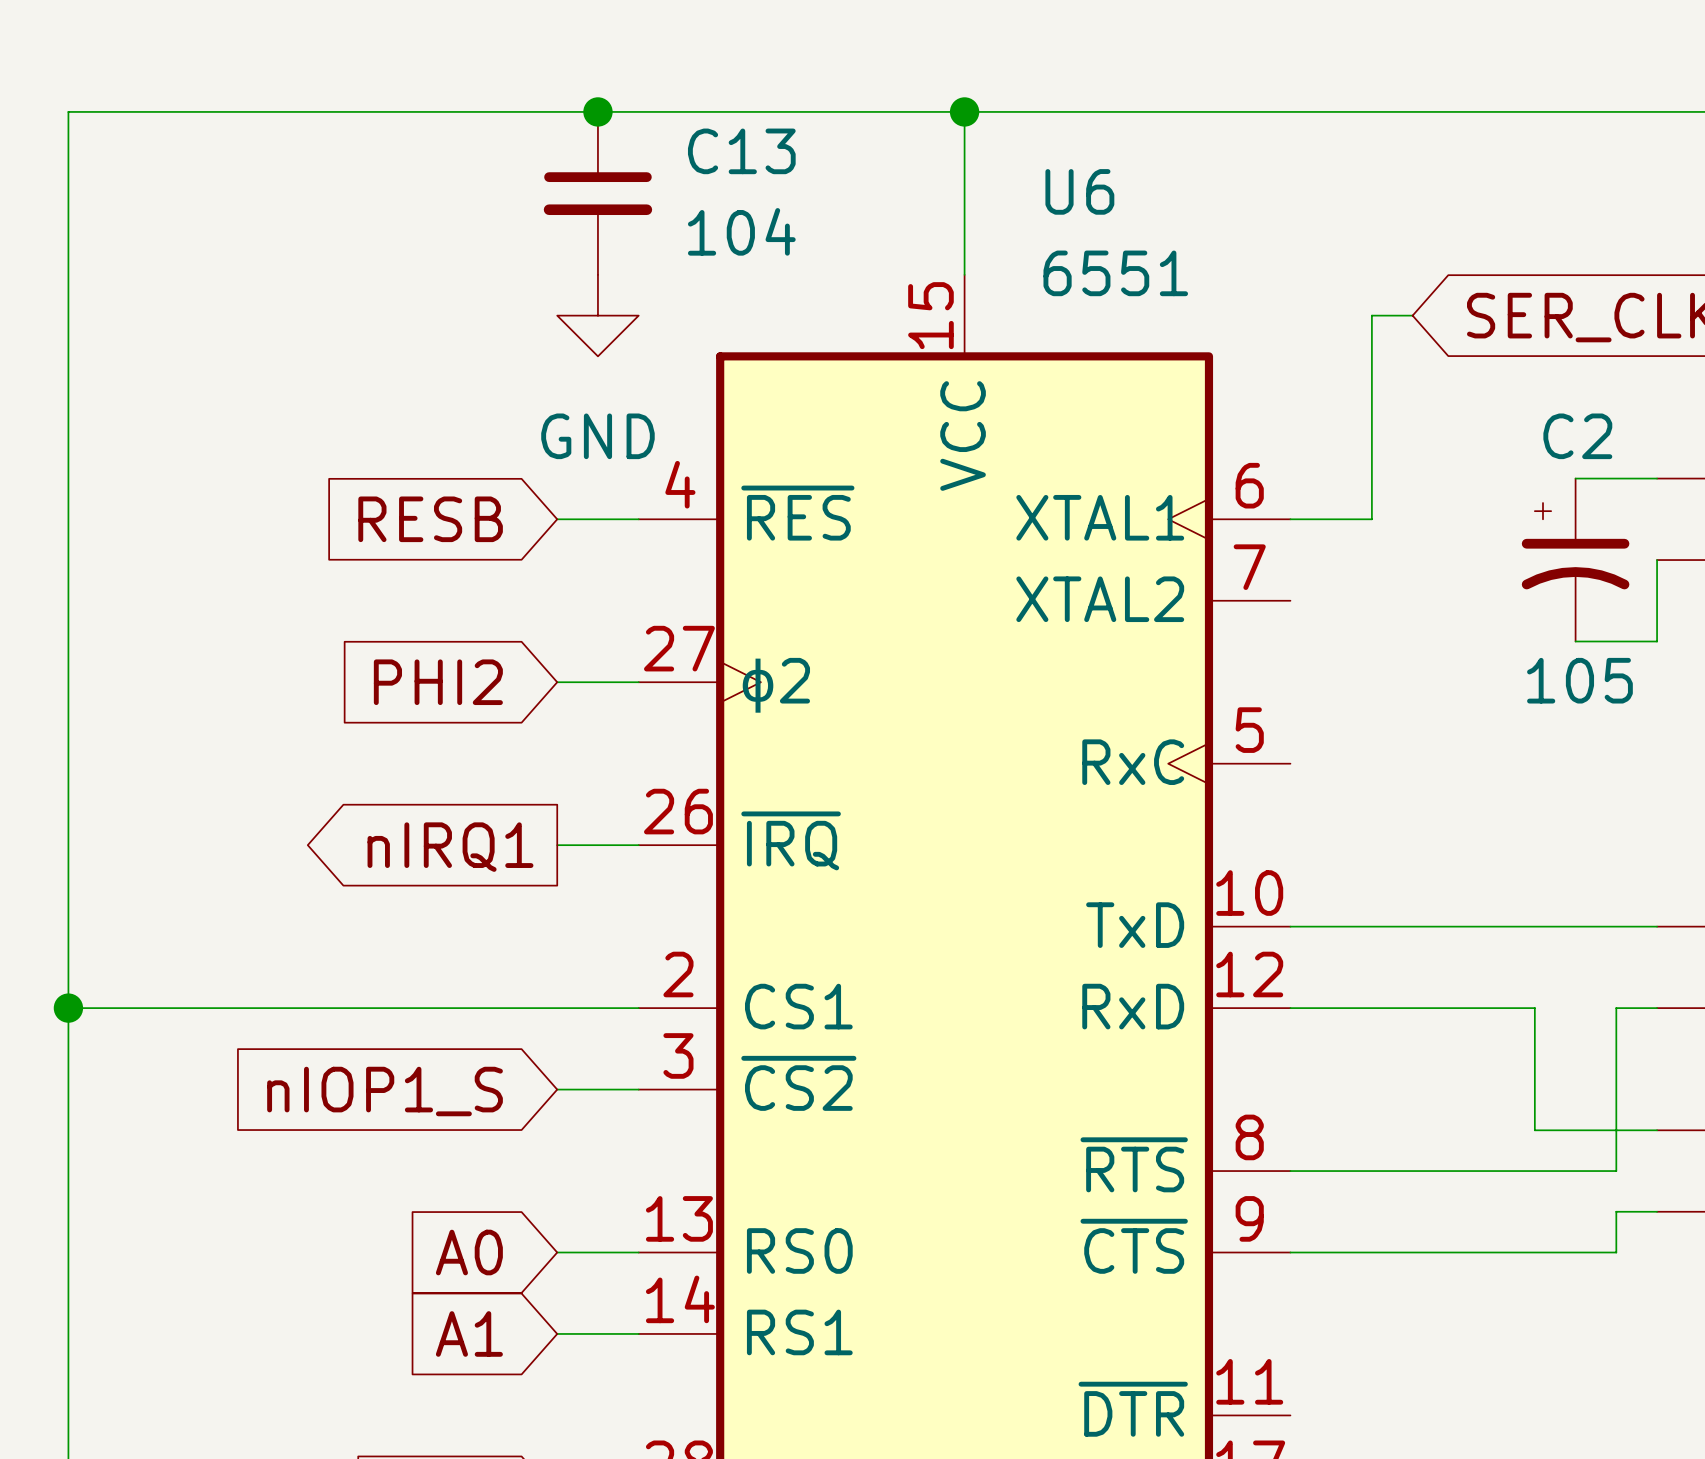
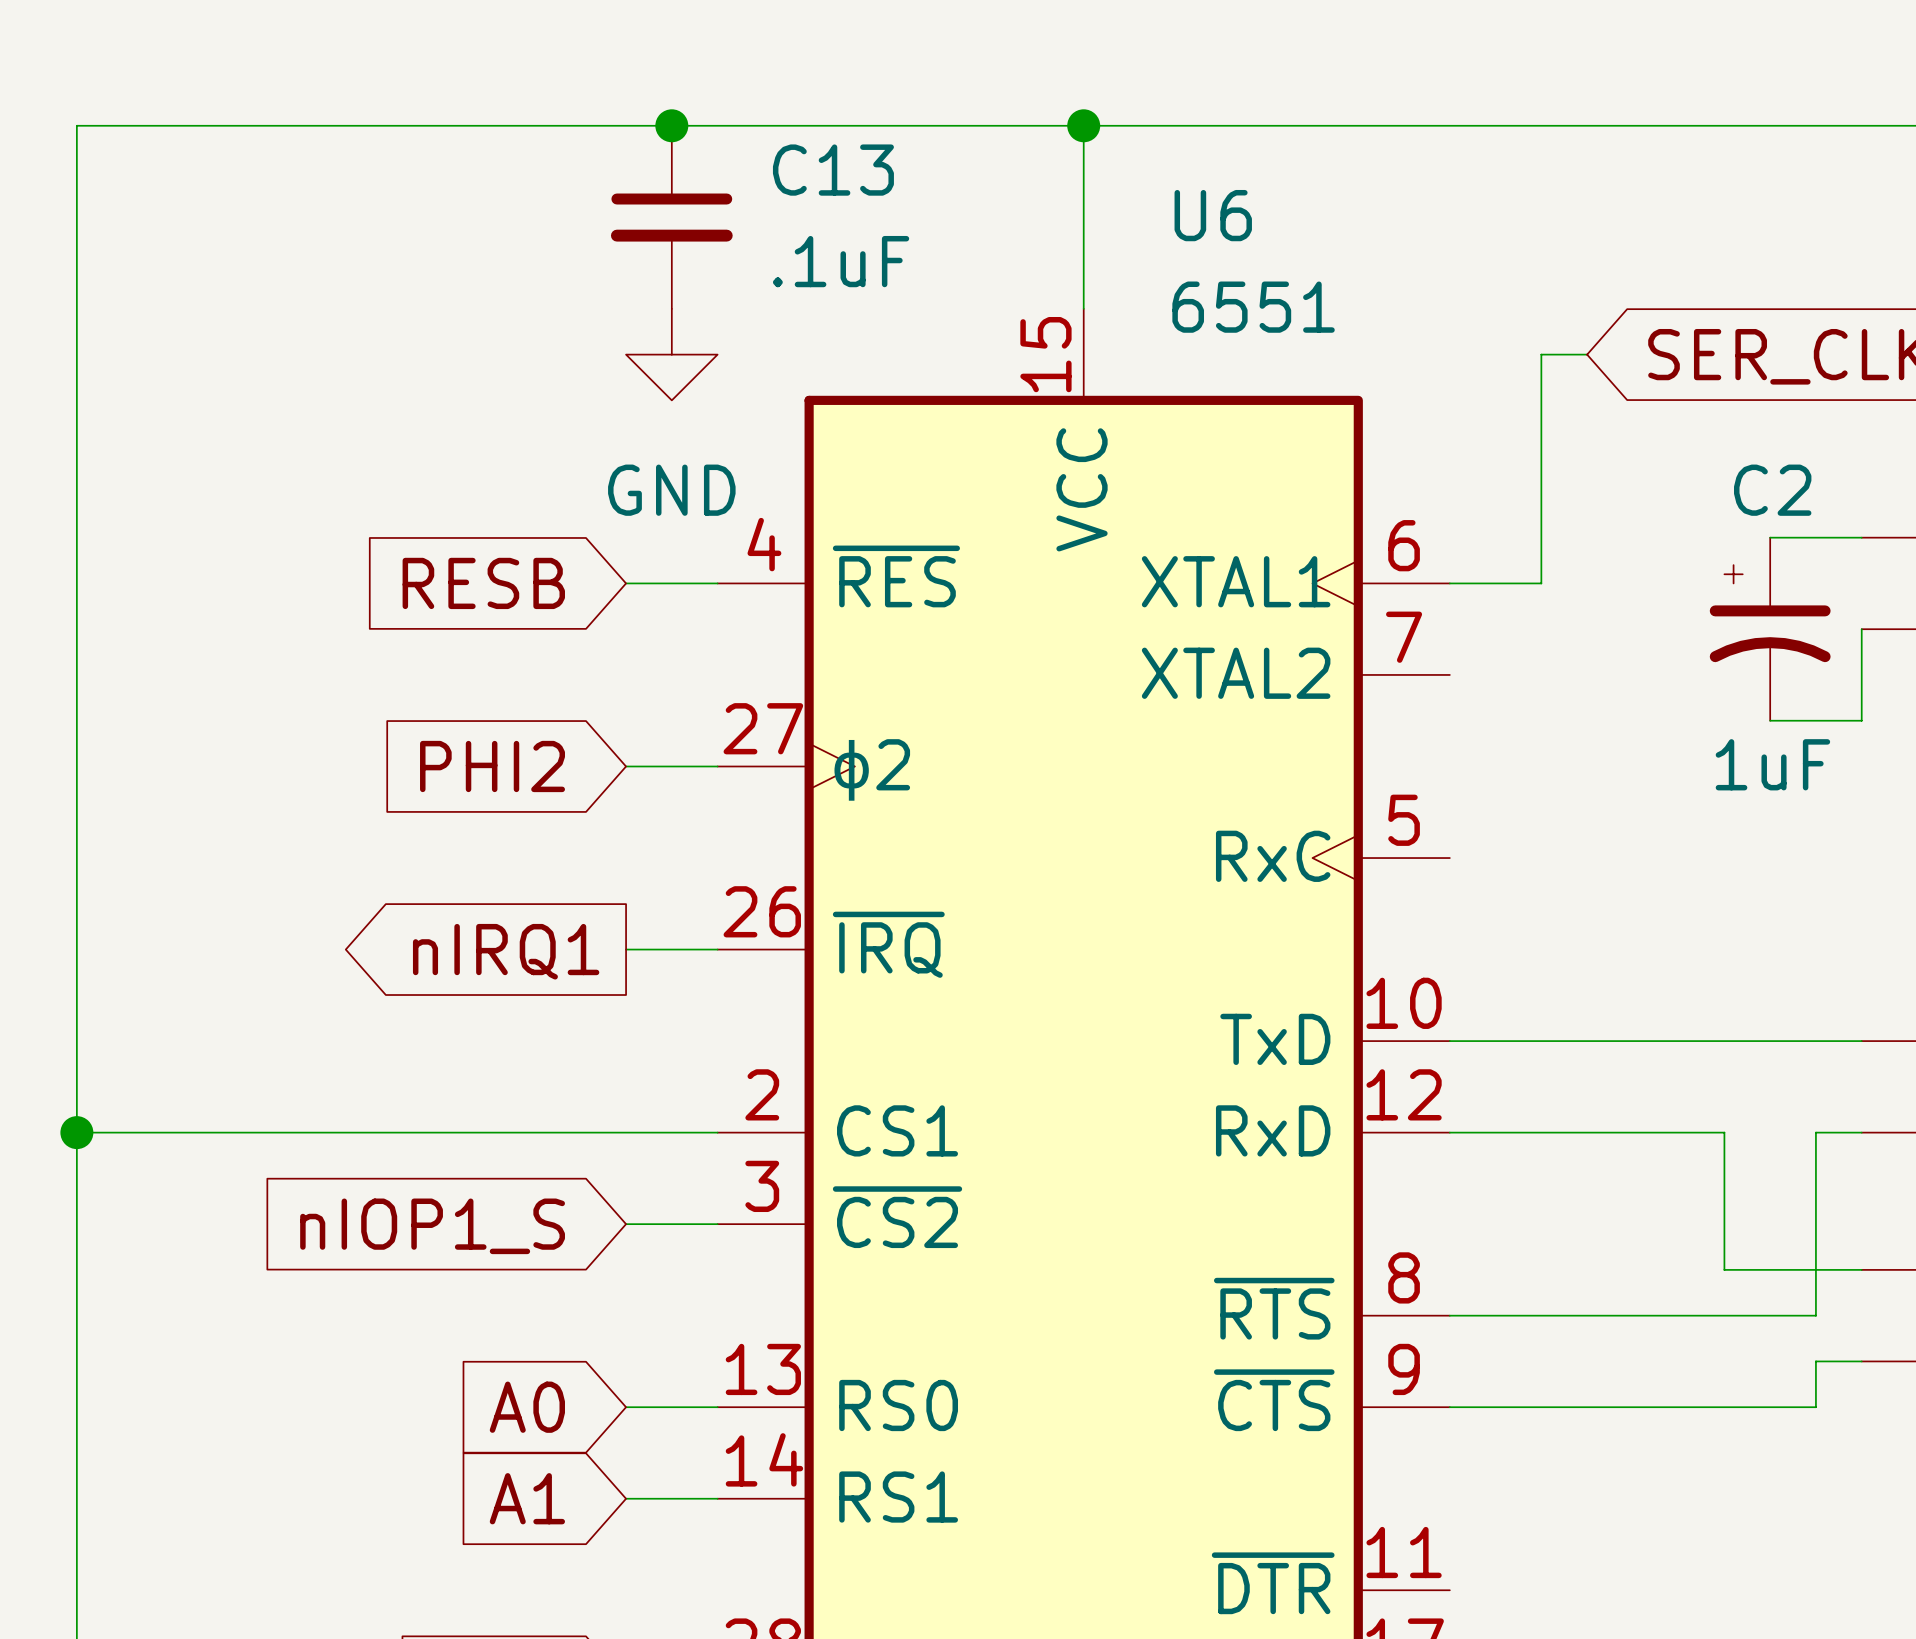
C13 value: 104 (741, 231) -> .1uF (841, 261)
C2 value: 105 (1579, 680) -> 1uF (1772, 764)

